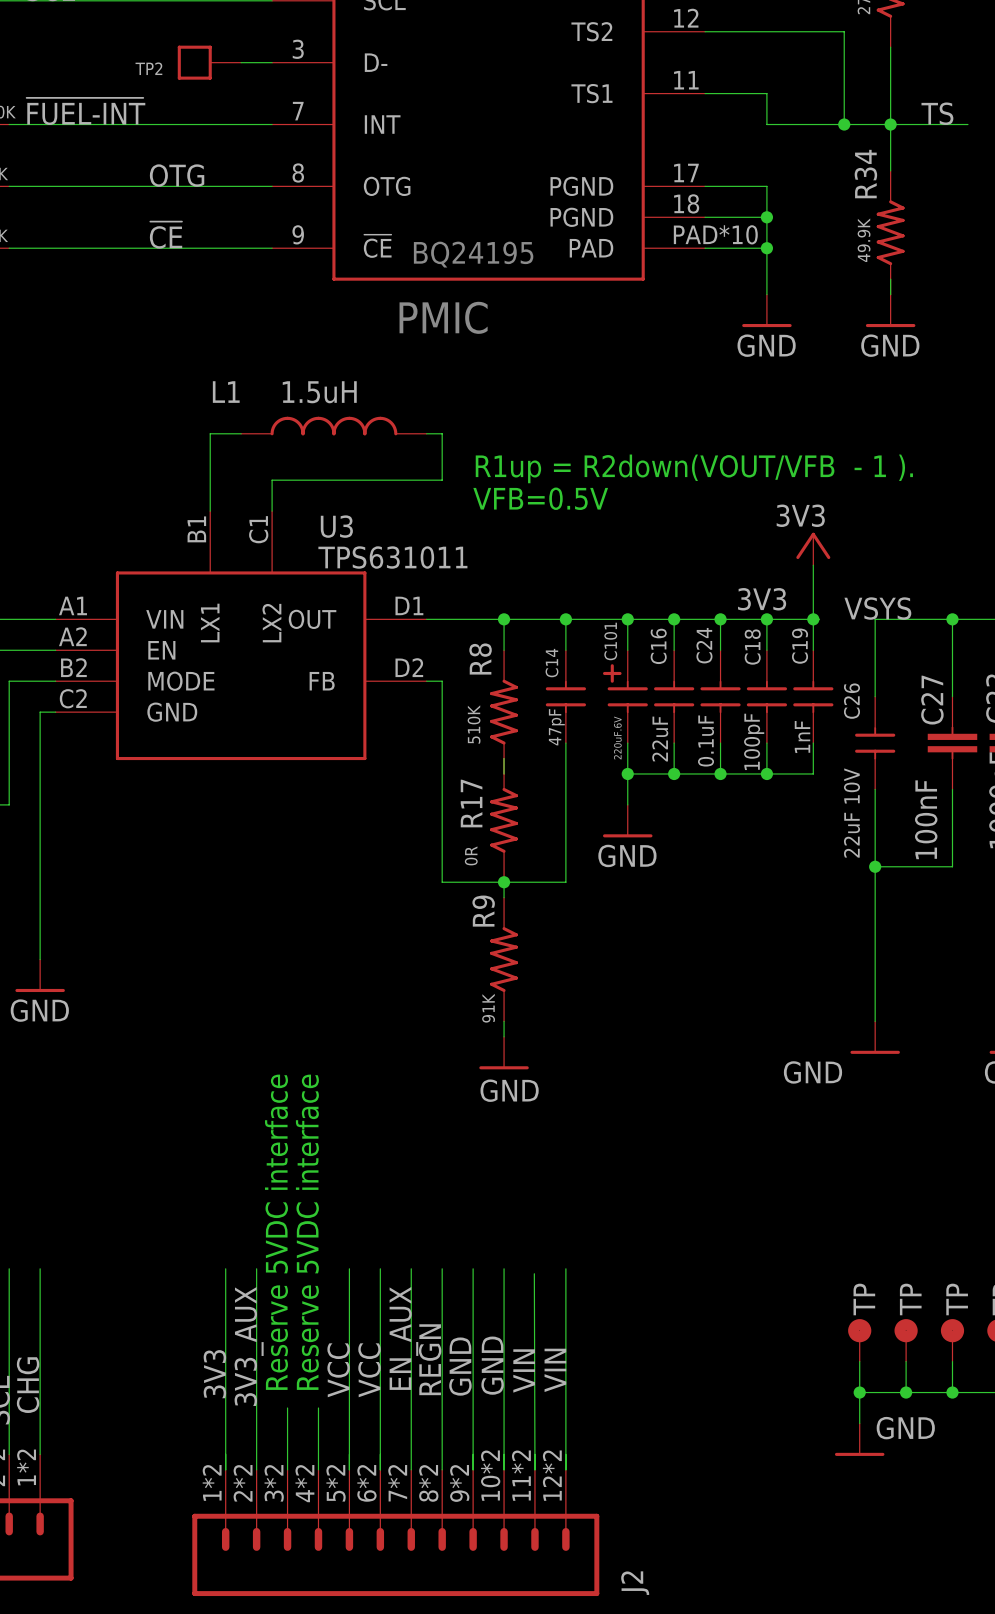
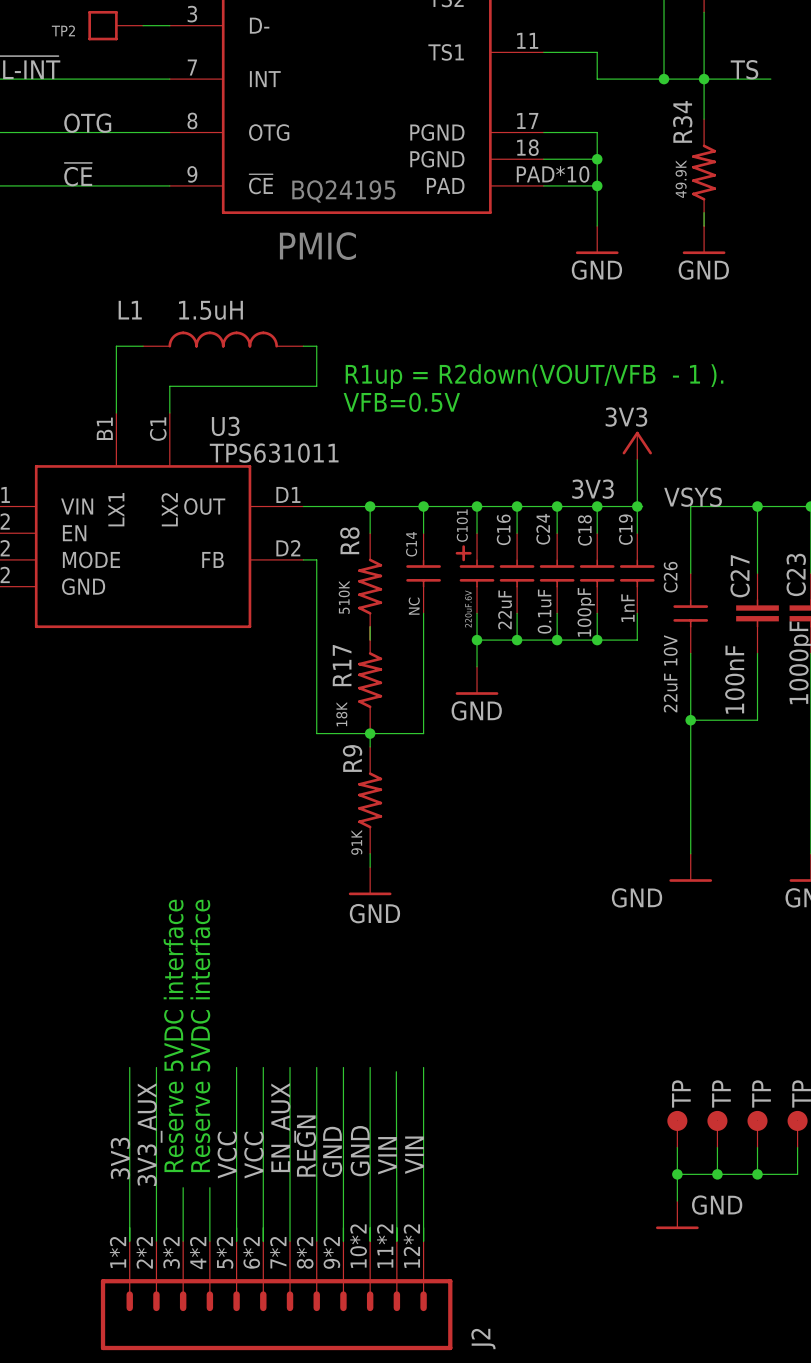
C14 value: 47pF (556, 727) -> NC (414, 606)
R17 value: 0R (471, 855) -> 18K (341, 714)

